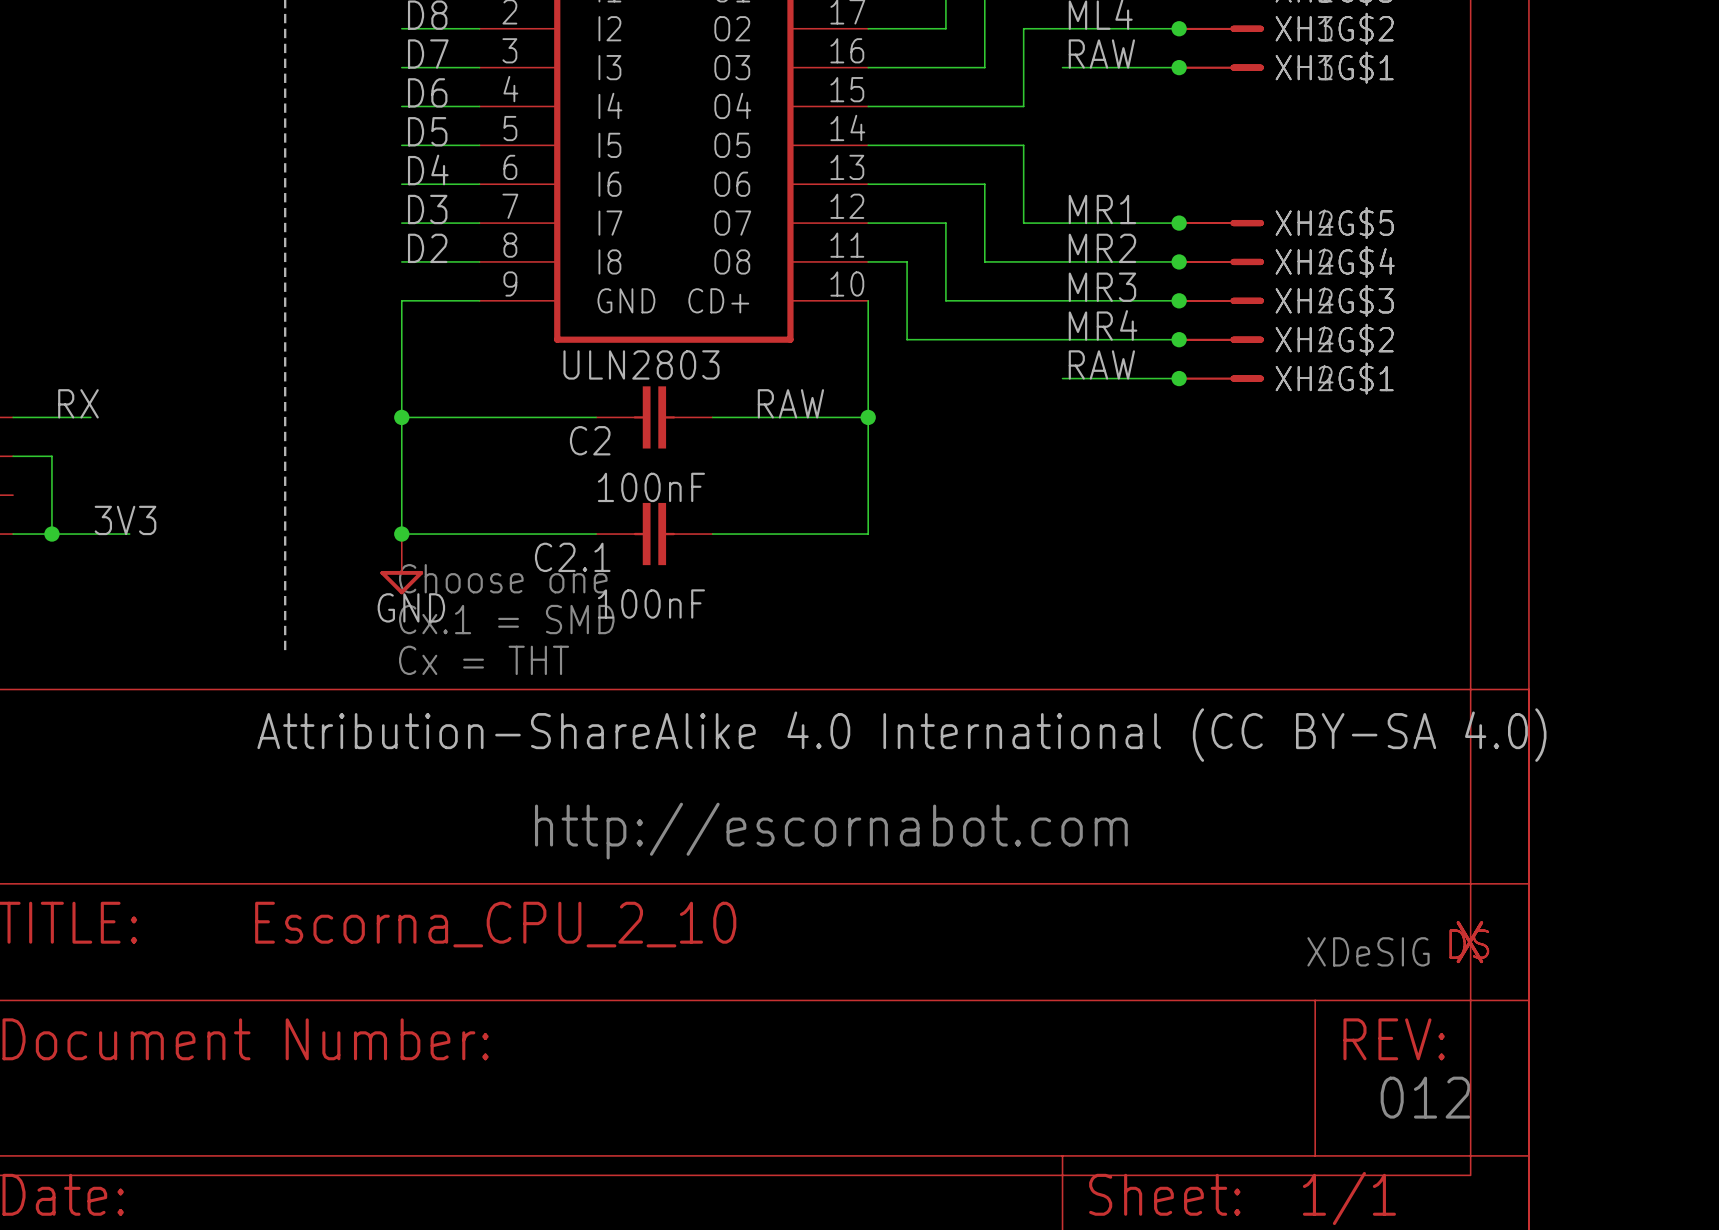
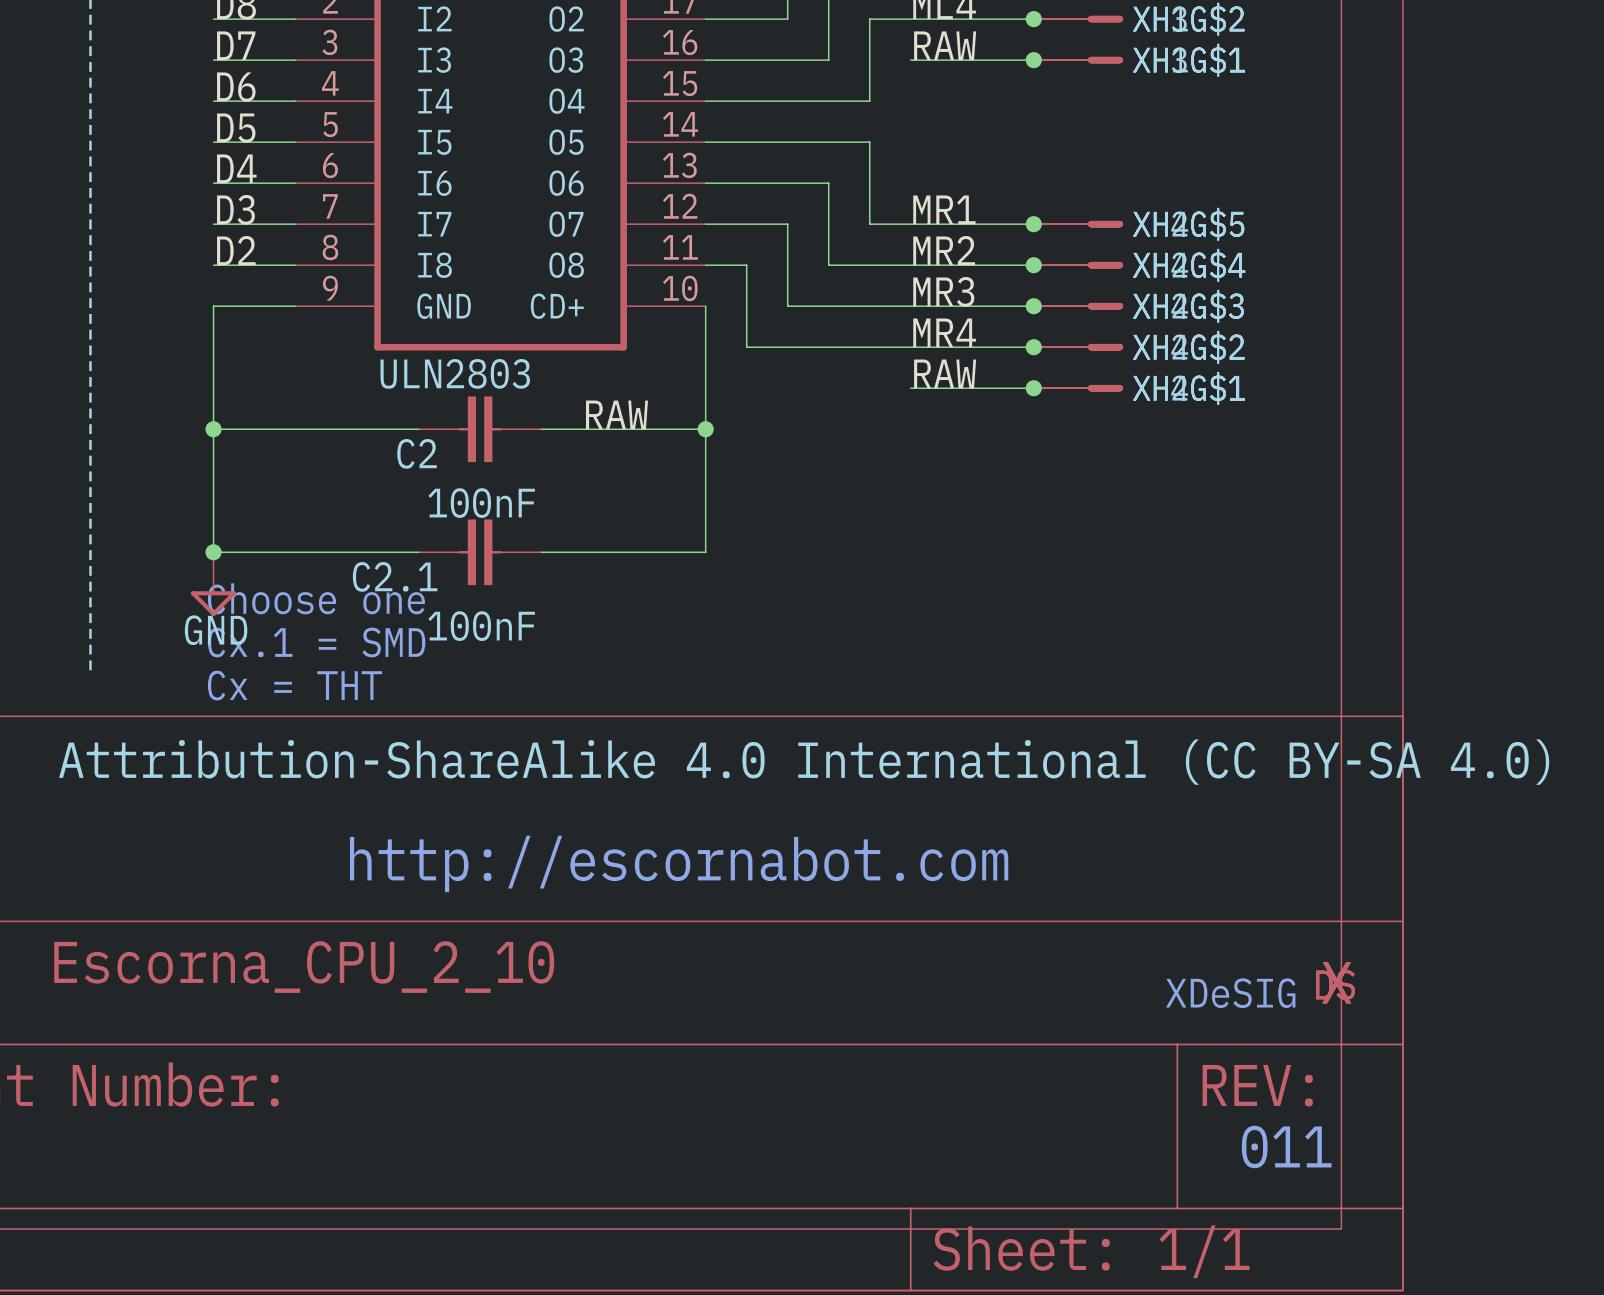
text: 012 (1425, 1097) -> 011 (1286, 1146)

